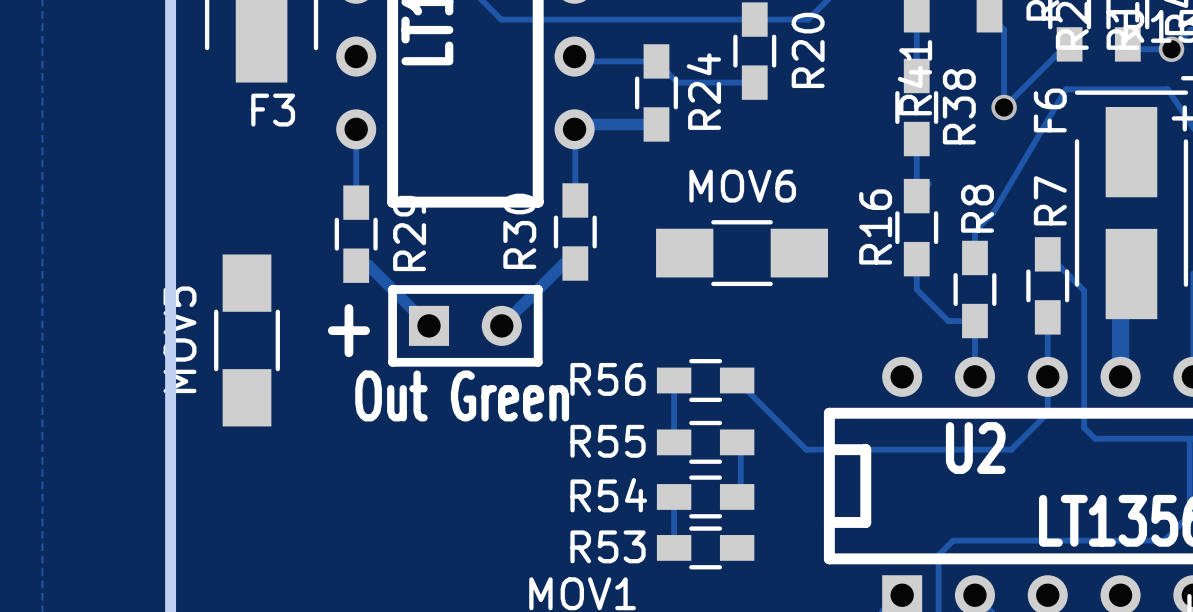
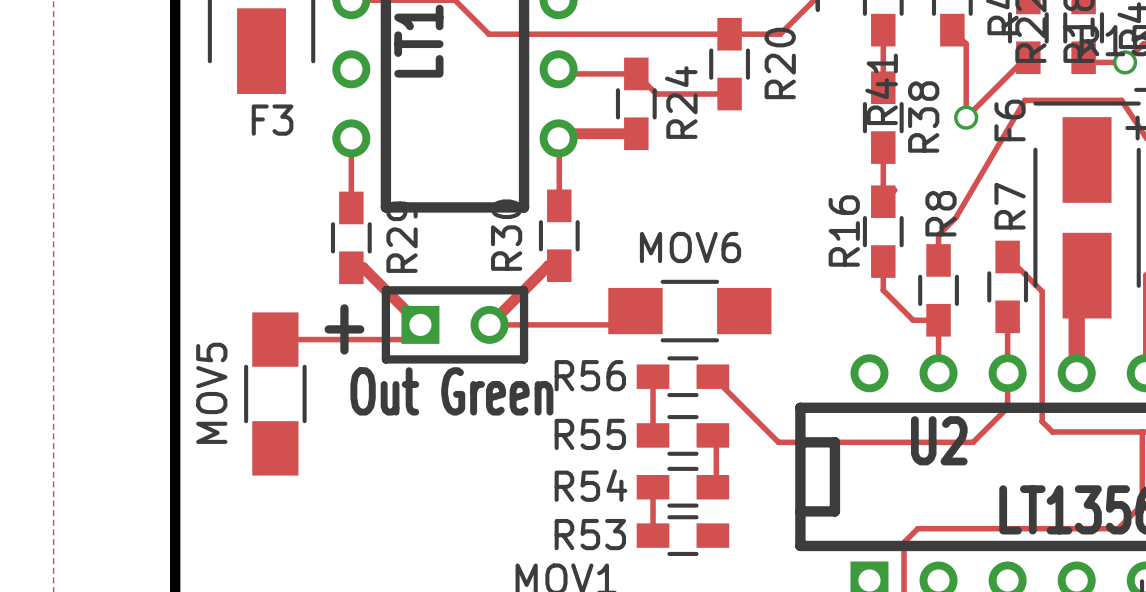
MOV6 position: (742, 253) -> (689, 311)
track: none -> (635, 311) (621, 324) (489, 324)
track: none -> (420, 324) (405, 339) (275, 339)
MOV5 position: (247, 340) -> (275, 393)

